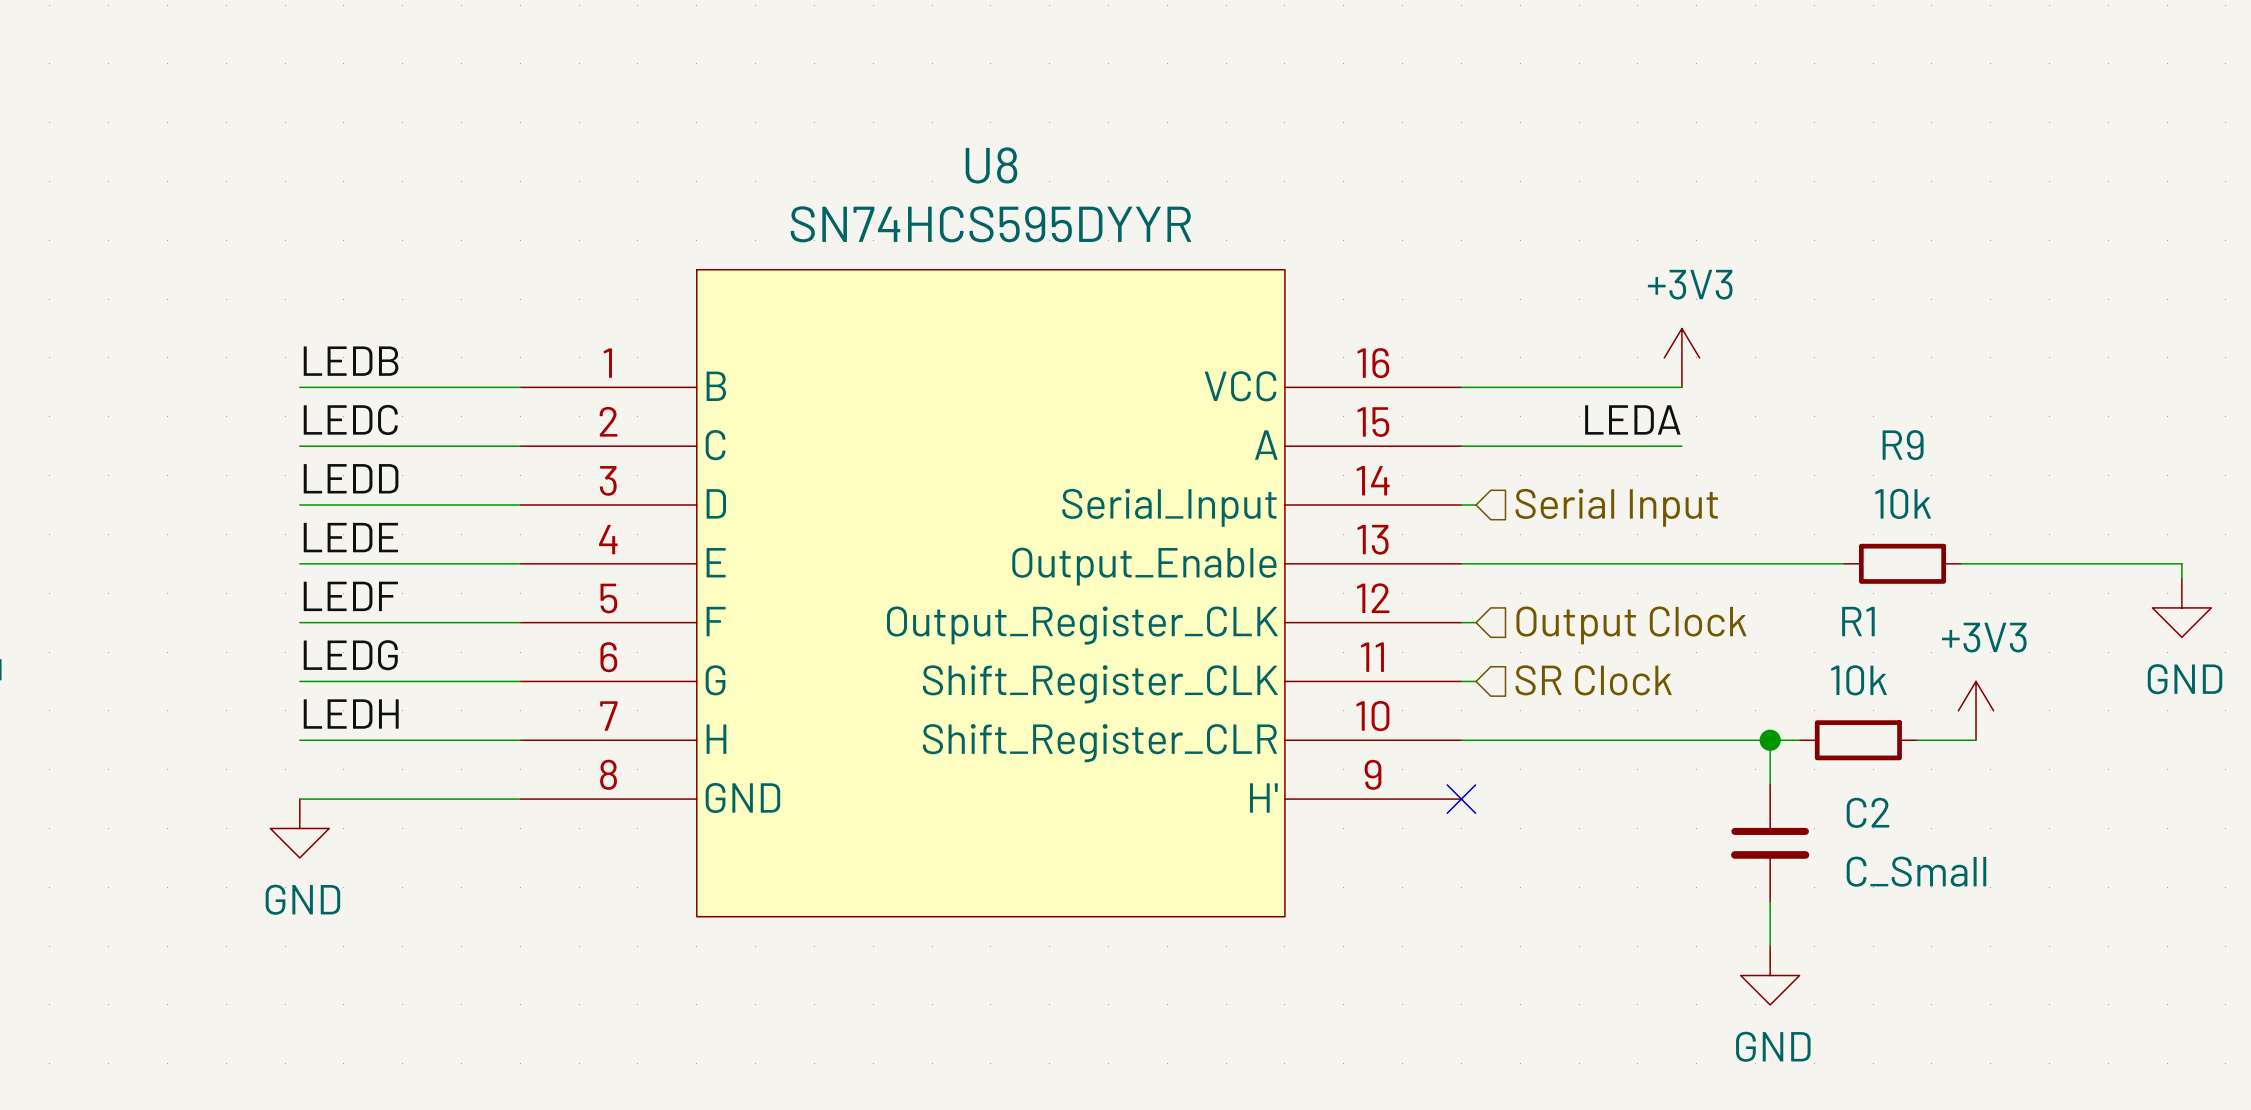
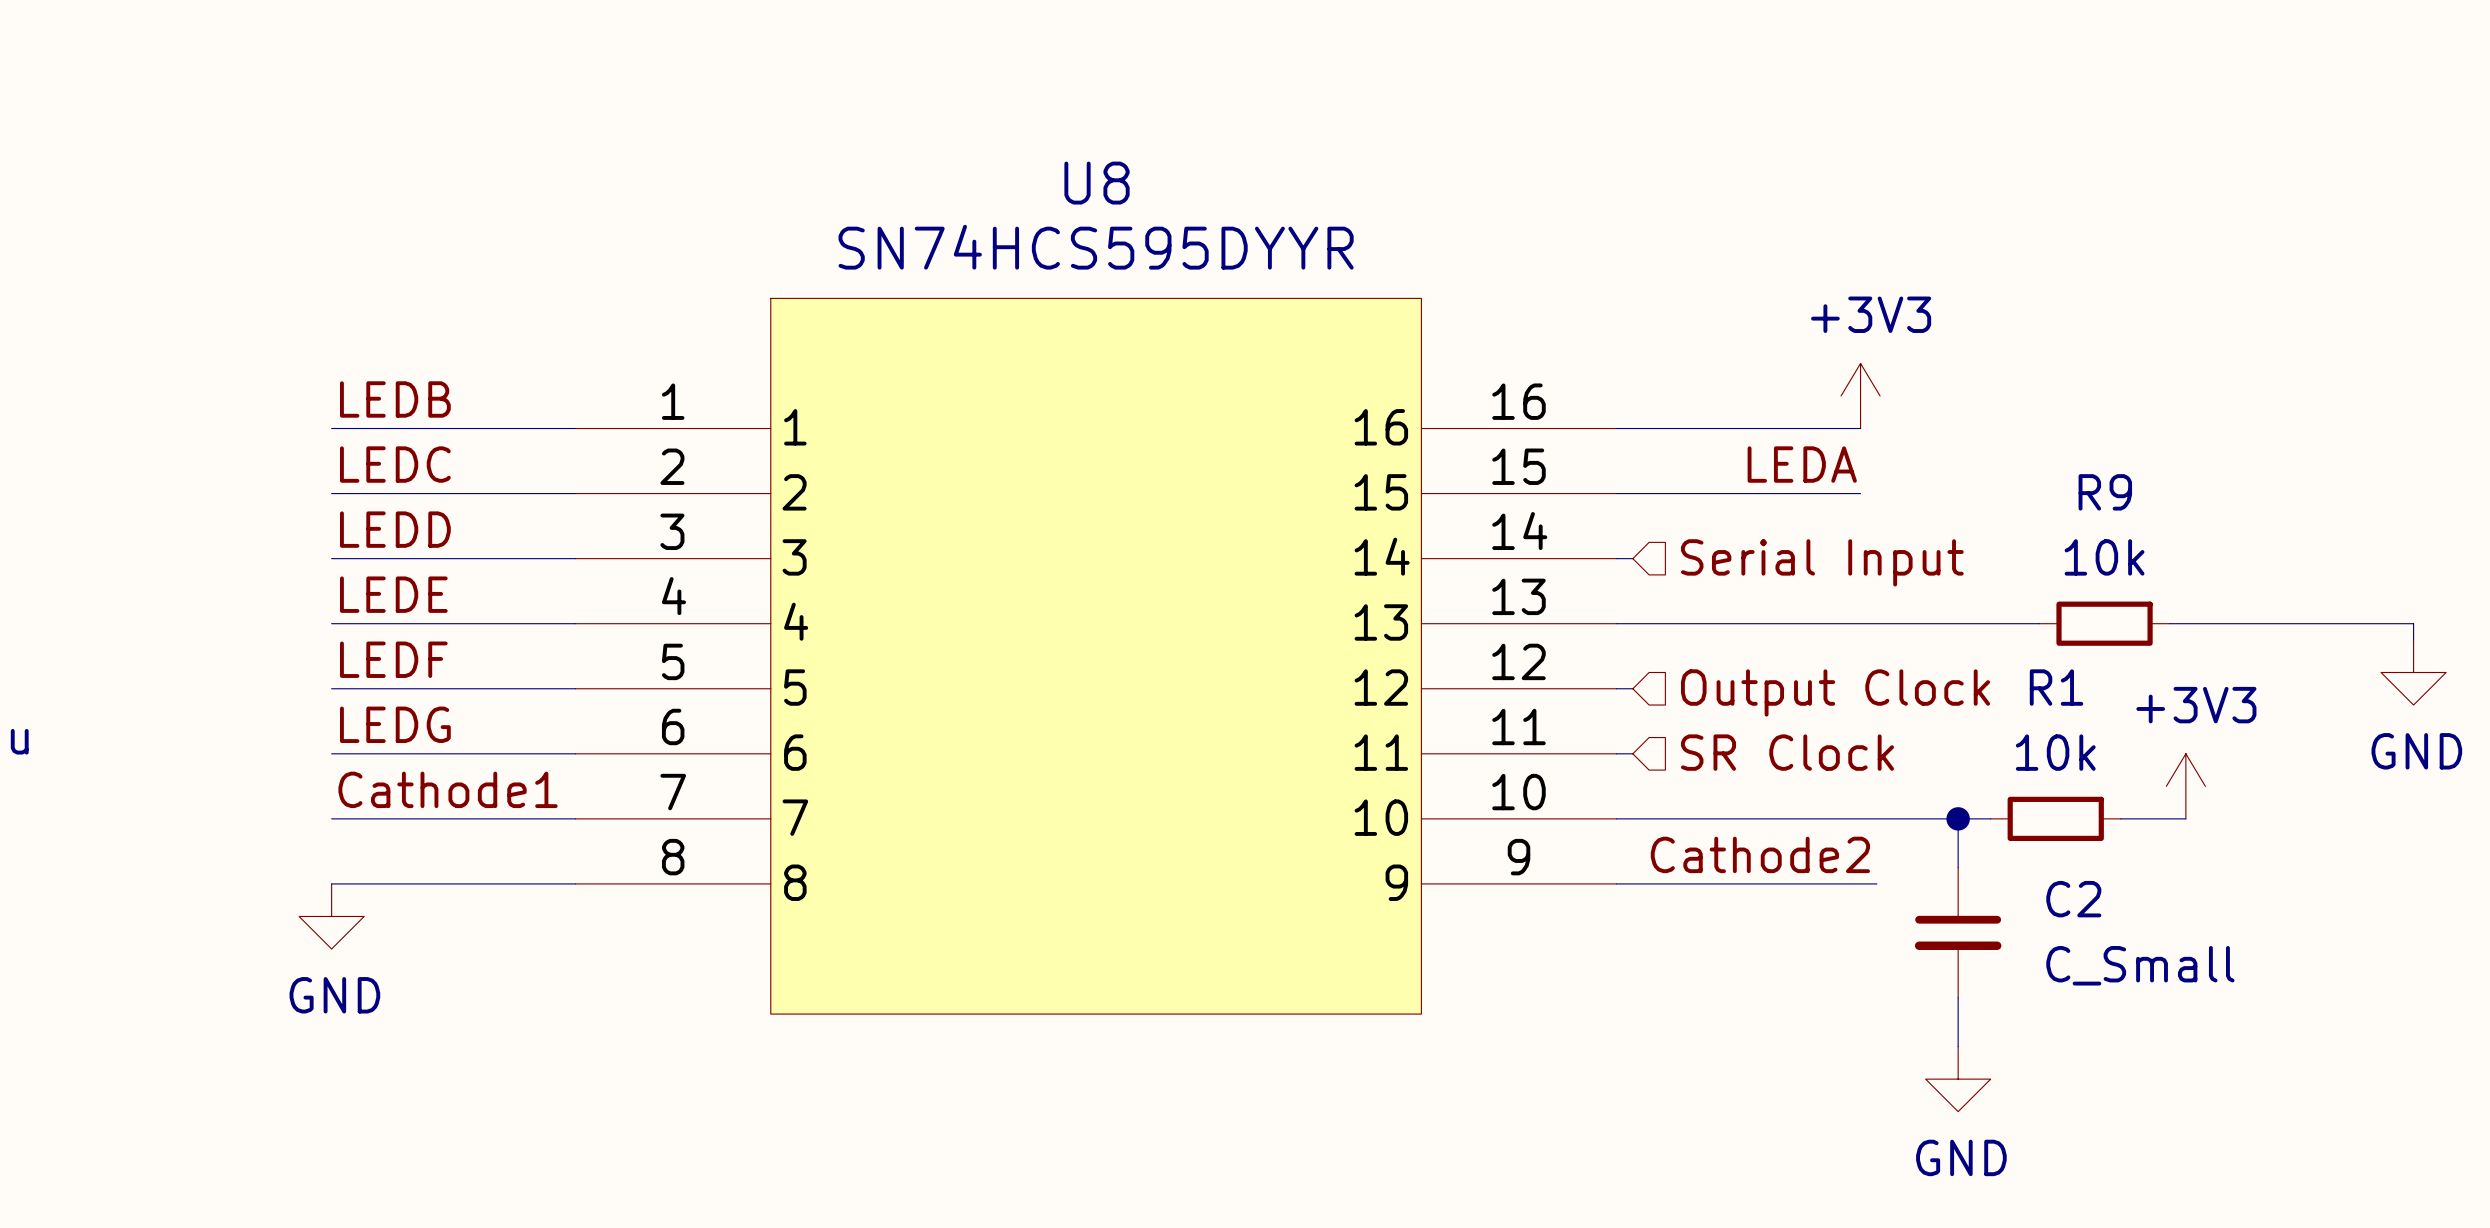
U8 symbol: [520, 269, 1462, 917] -> [575, 298, 1617, 1015]
label: LEDH (351, 714) -> Cathode1 (448, 789)
label: none -> Cathode2 (1760, 854)
wire: none -> (1616, 883) (1876, 883)
no-connect mark: (1461, 799) -> none

